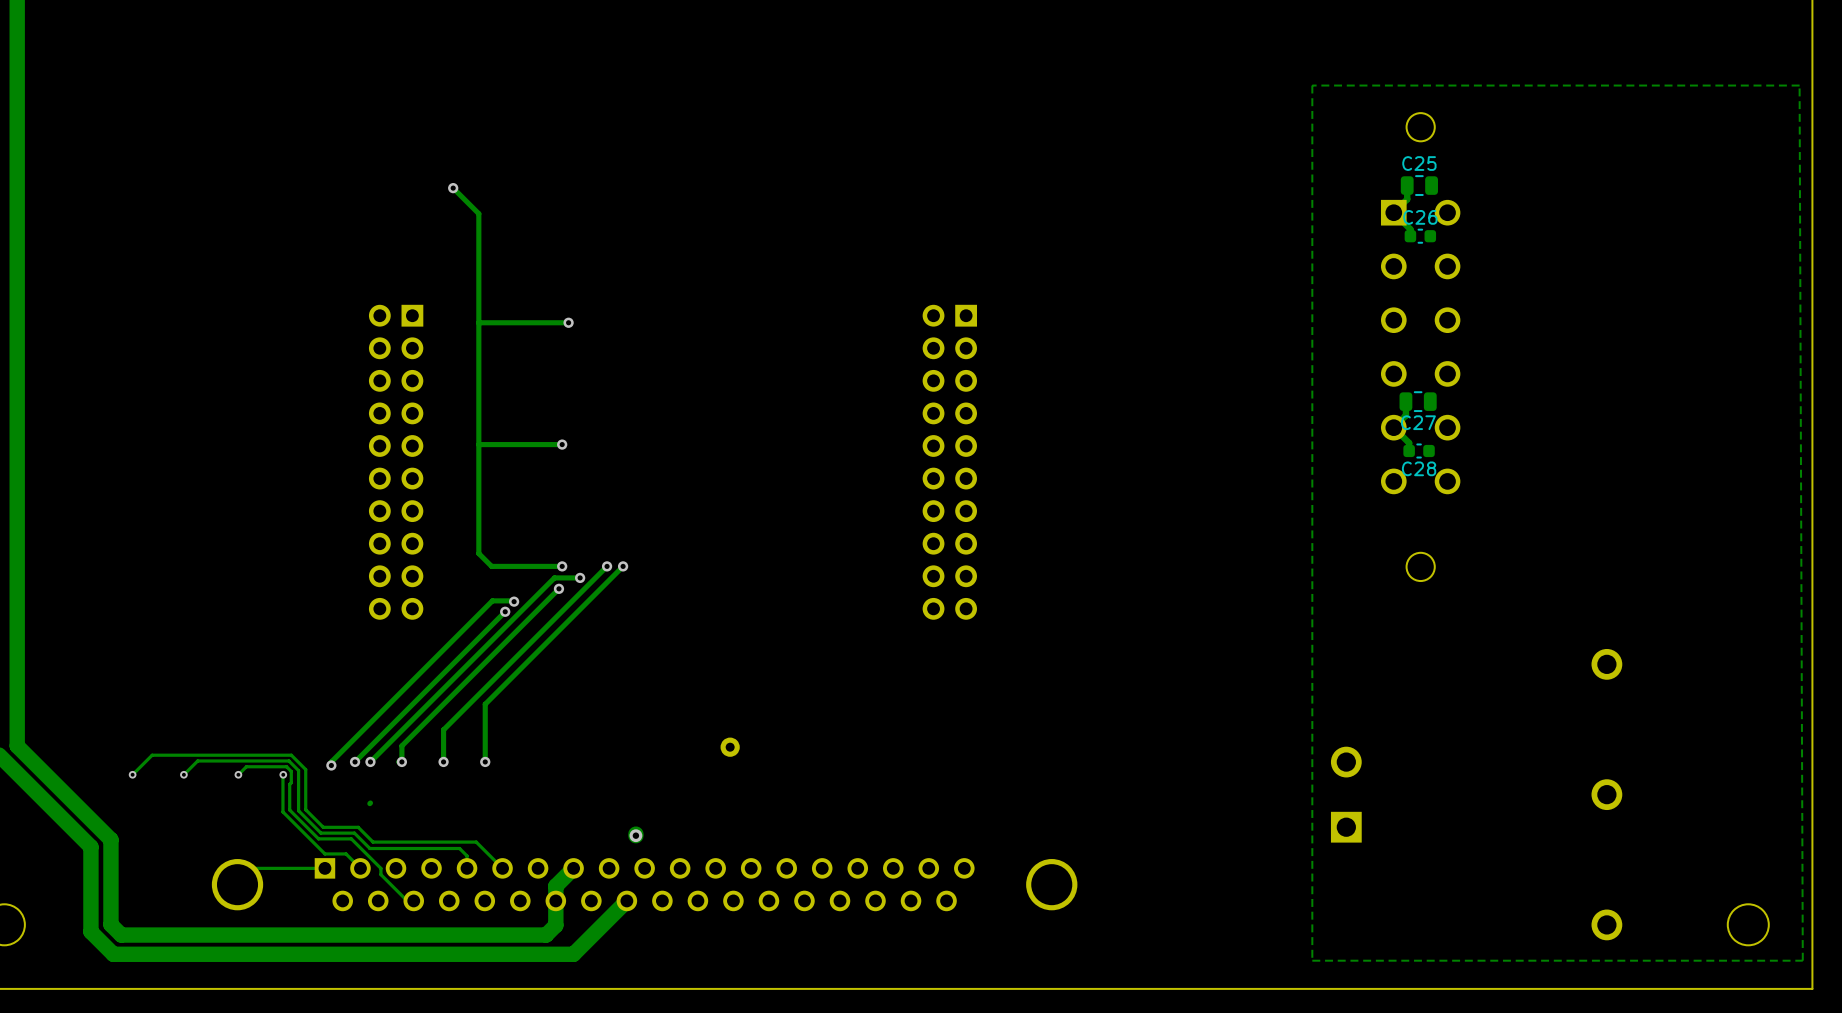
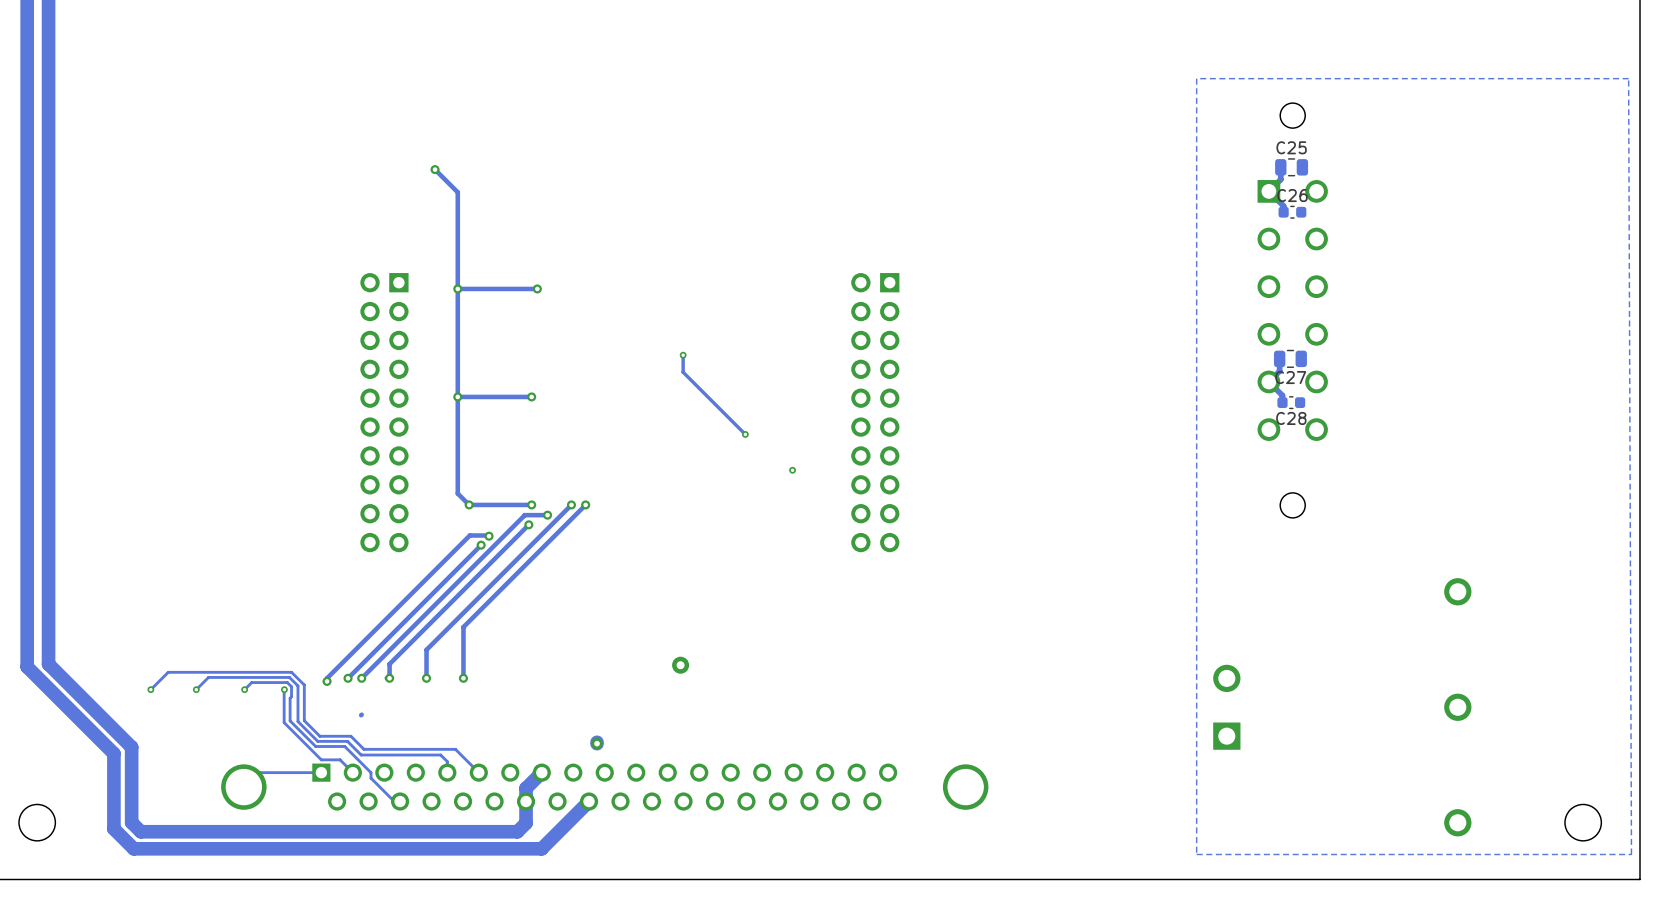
via: none -> (457, 288)
track: none -> (683, 355) (683, 372) (745, 434)
via: none -> (683, 355)
via: none -> (457, 396)
via: none -> (745, 434)
via: none -> (792, 470)
via: none -> (469, 504)

